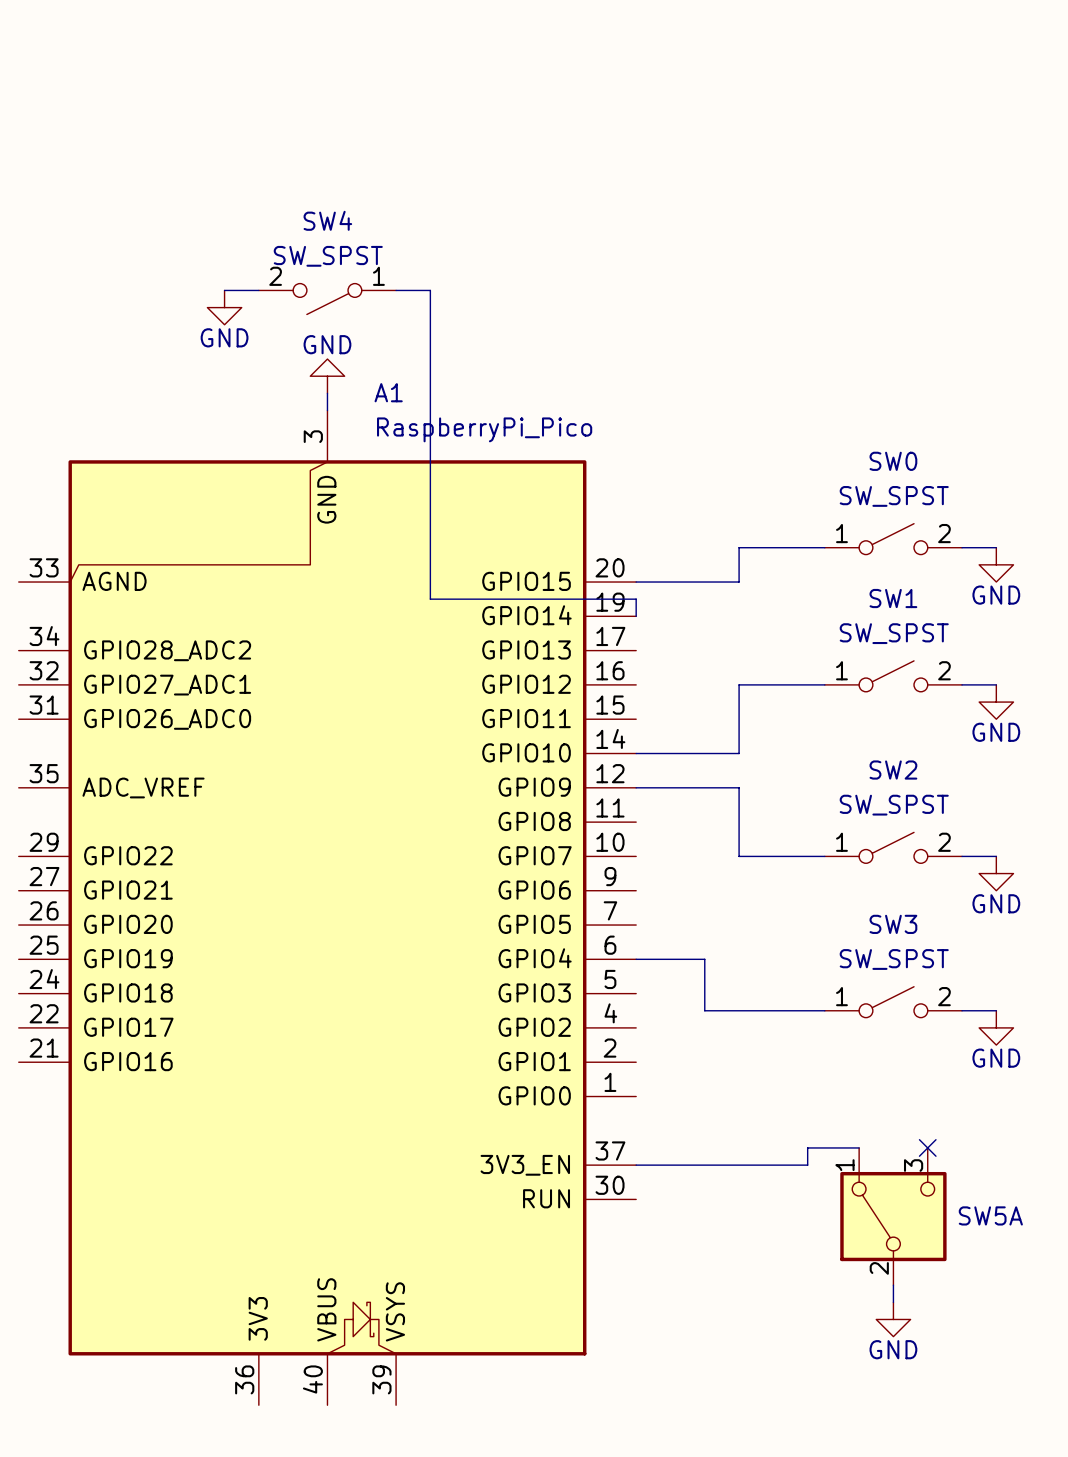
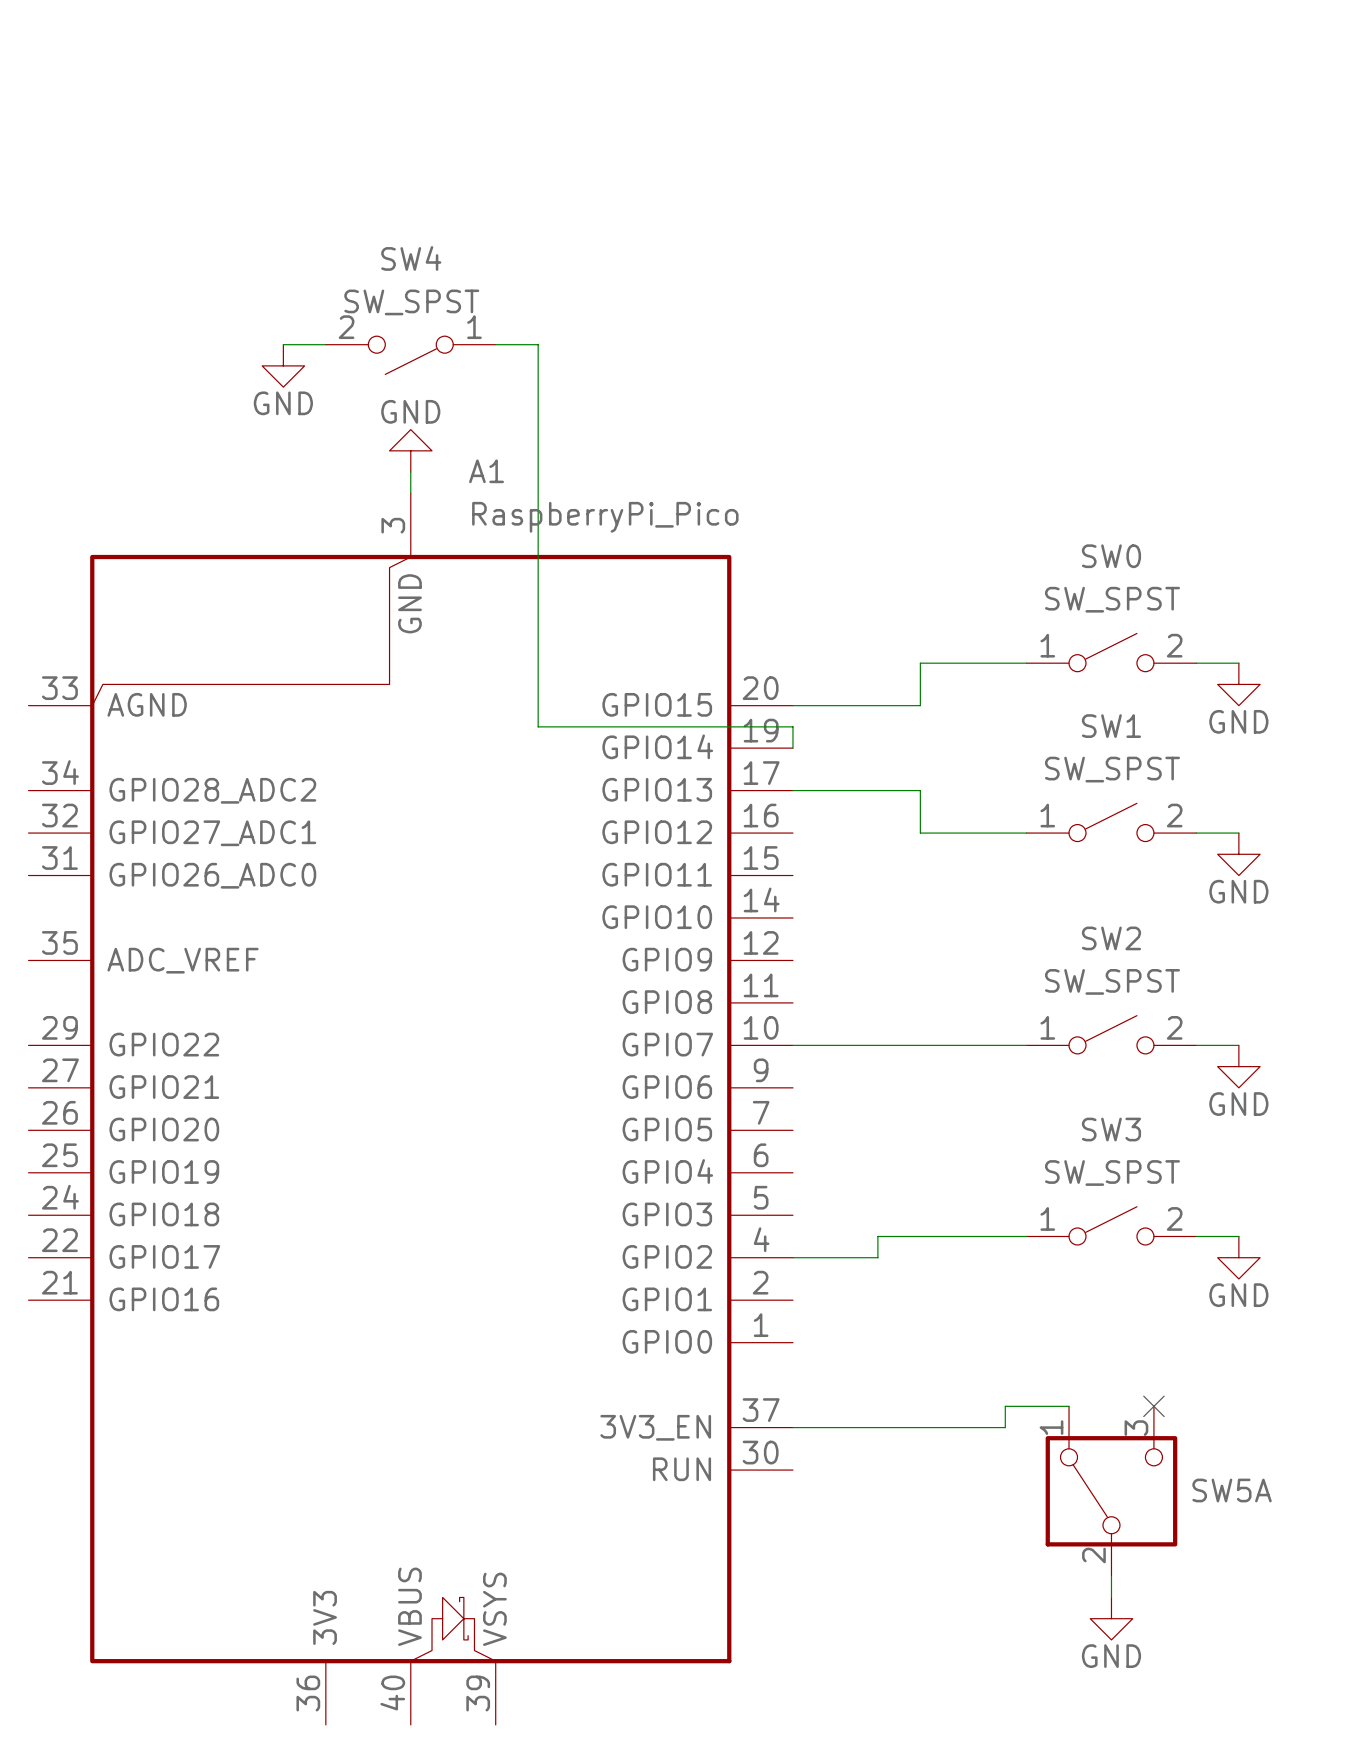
wire: (739, 684) (739, 753) (636, 753) -> (920, 833) (920, 790) (792, 790)
wire: (636, 787) (739, 787) (739, 856) -> (792, 1045) (920, 1045)
wire: (636, 959) (704, 959) (704, 1010) -> (792, 1257) (877, 1257) (877, 1236)

